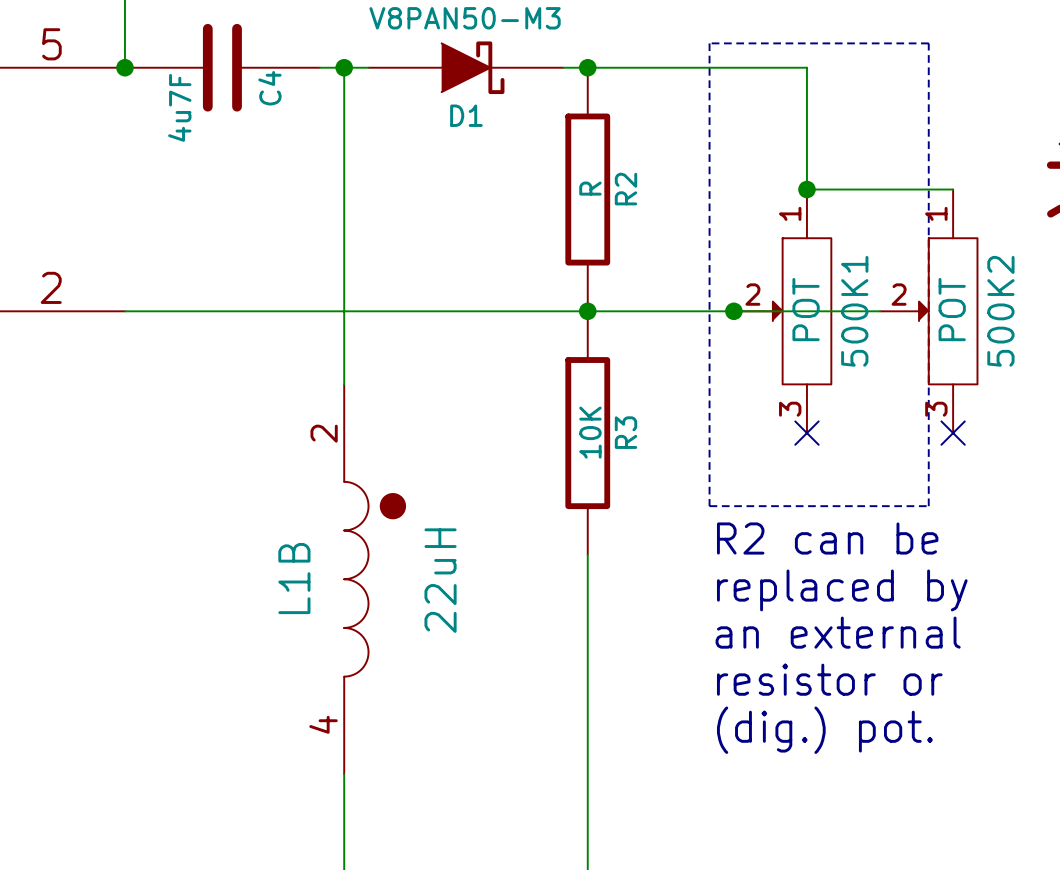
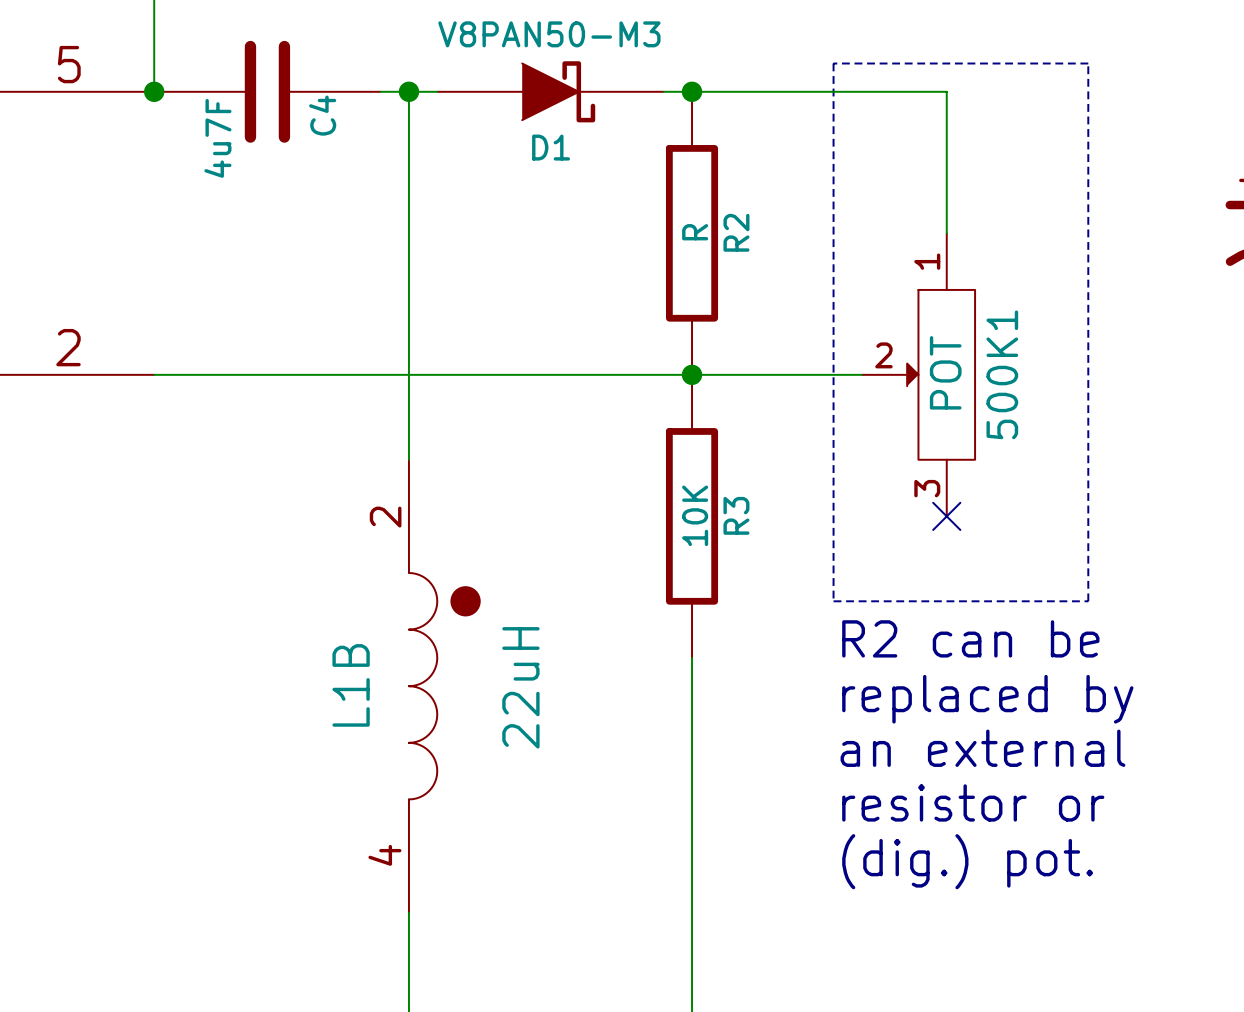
wire: (806, 189) (953, 189) -> none
junction: (806, 189) -> none
wire: (733, 311) (880, 311) -> none
junction: (733, 311) -> none
500K2: POT (928, 311) -> none
no-connect mark: (953, 433) -> none

